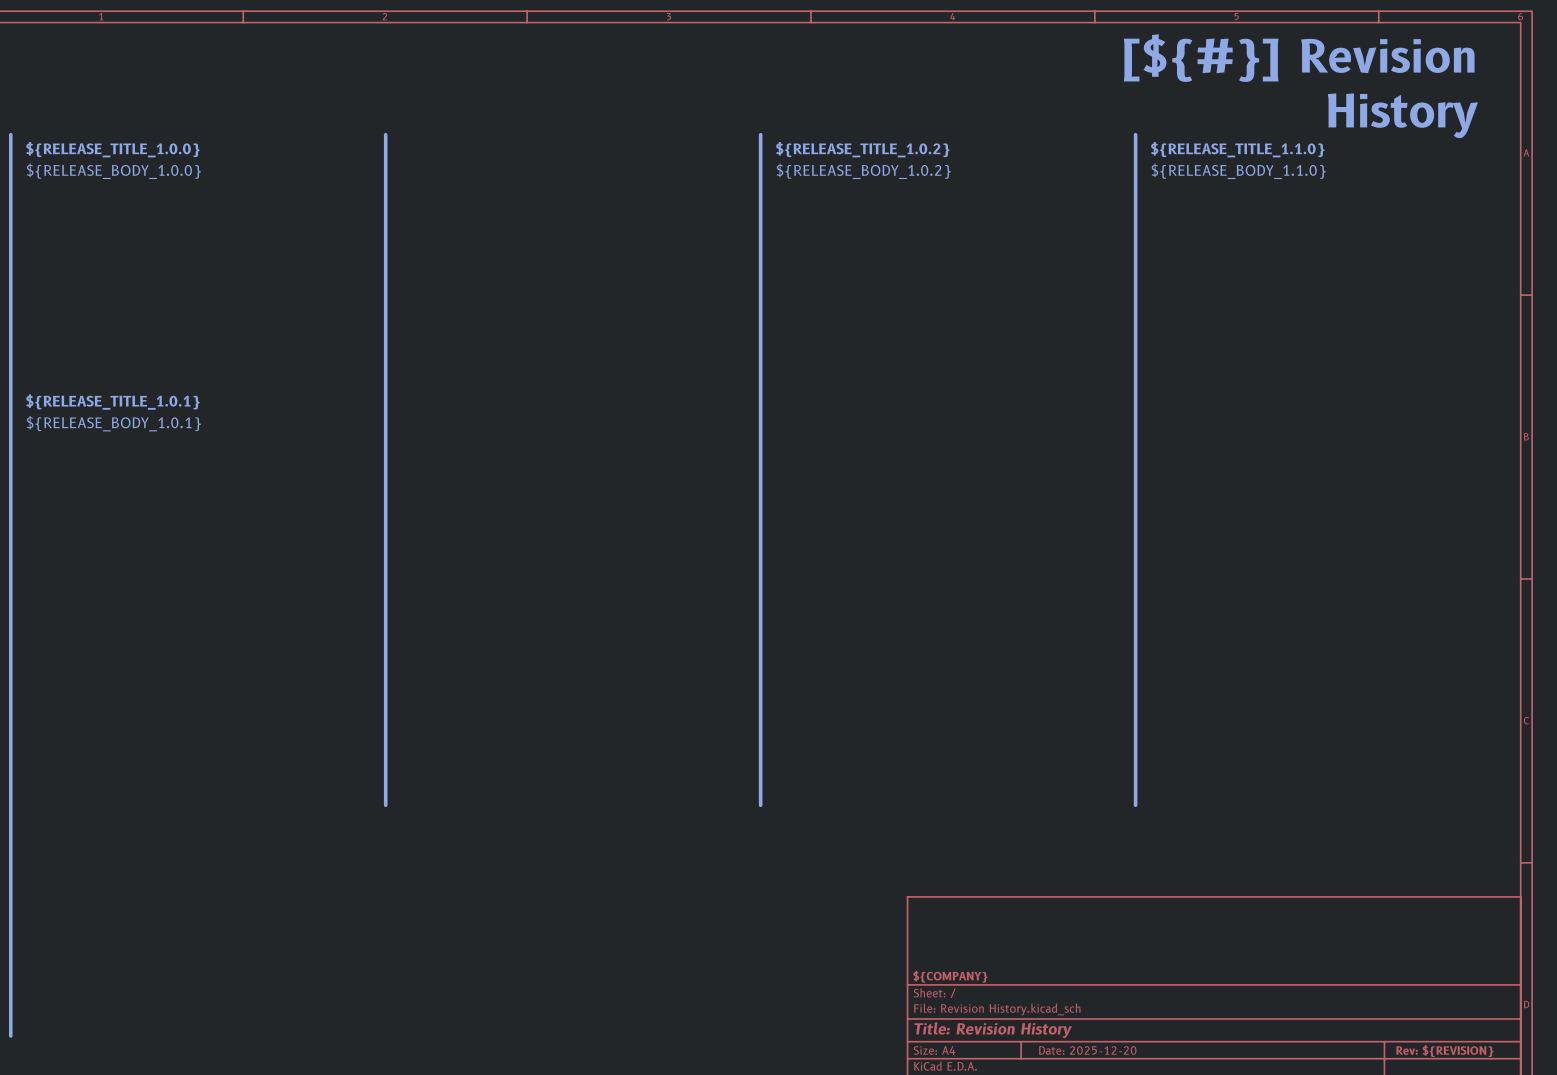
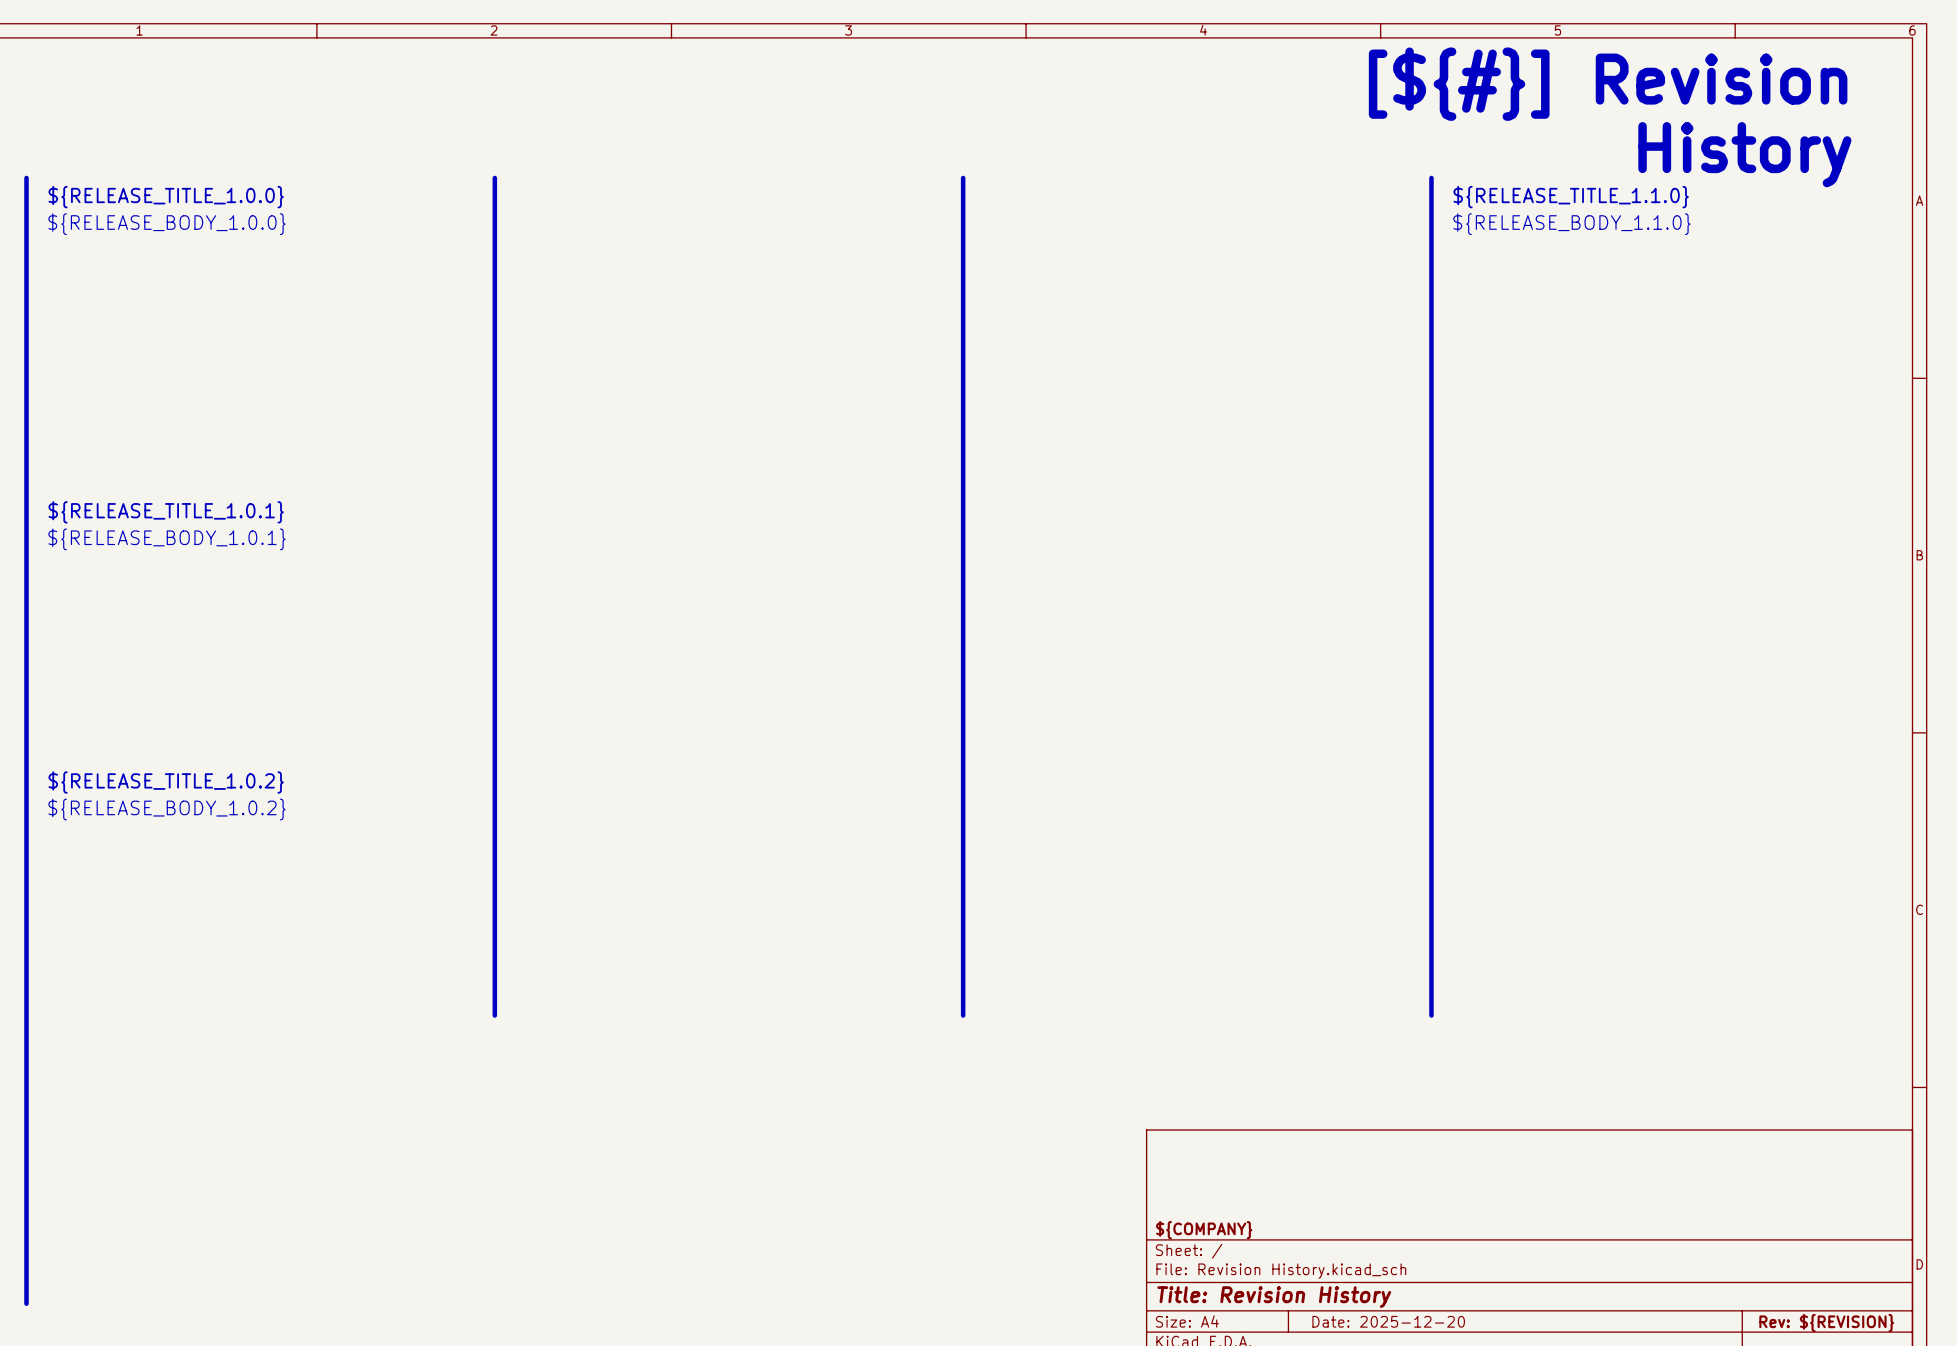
text: ${RELEASE_TITLE_1.0.2} (862, 149) -> none
text: ${RELEASE_BODY_1.0.2} (863, 171) -> none
text: none -> ${RELEASE_TITLE_1.0.2} (166, 782)
text: none -> ${RELEASE_BODY_1.0.2} (166, 809)

